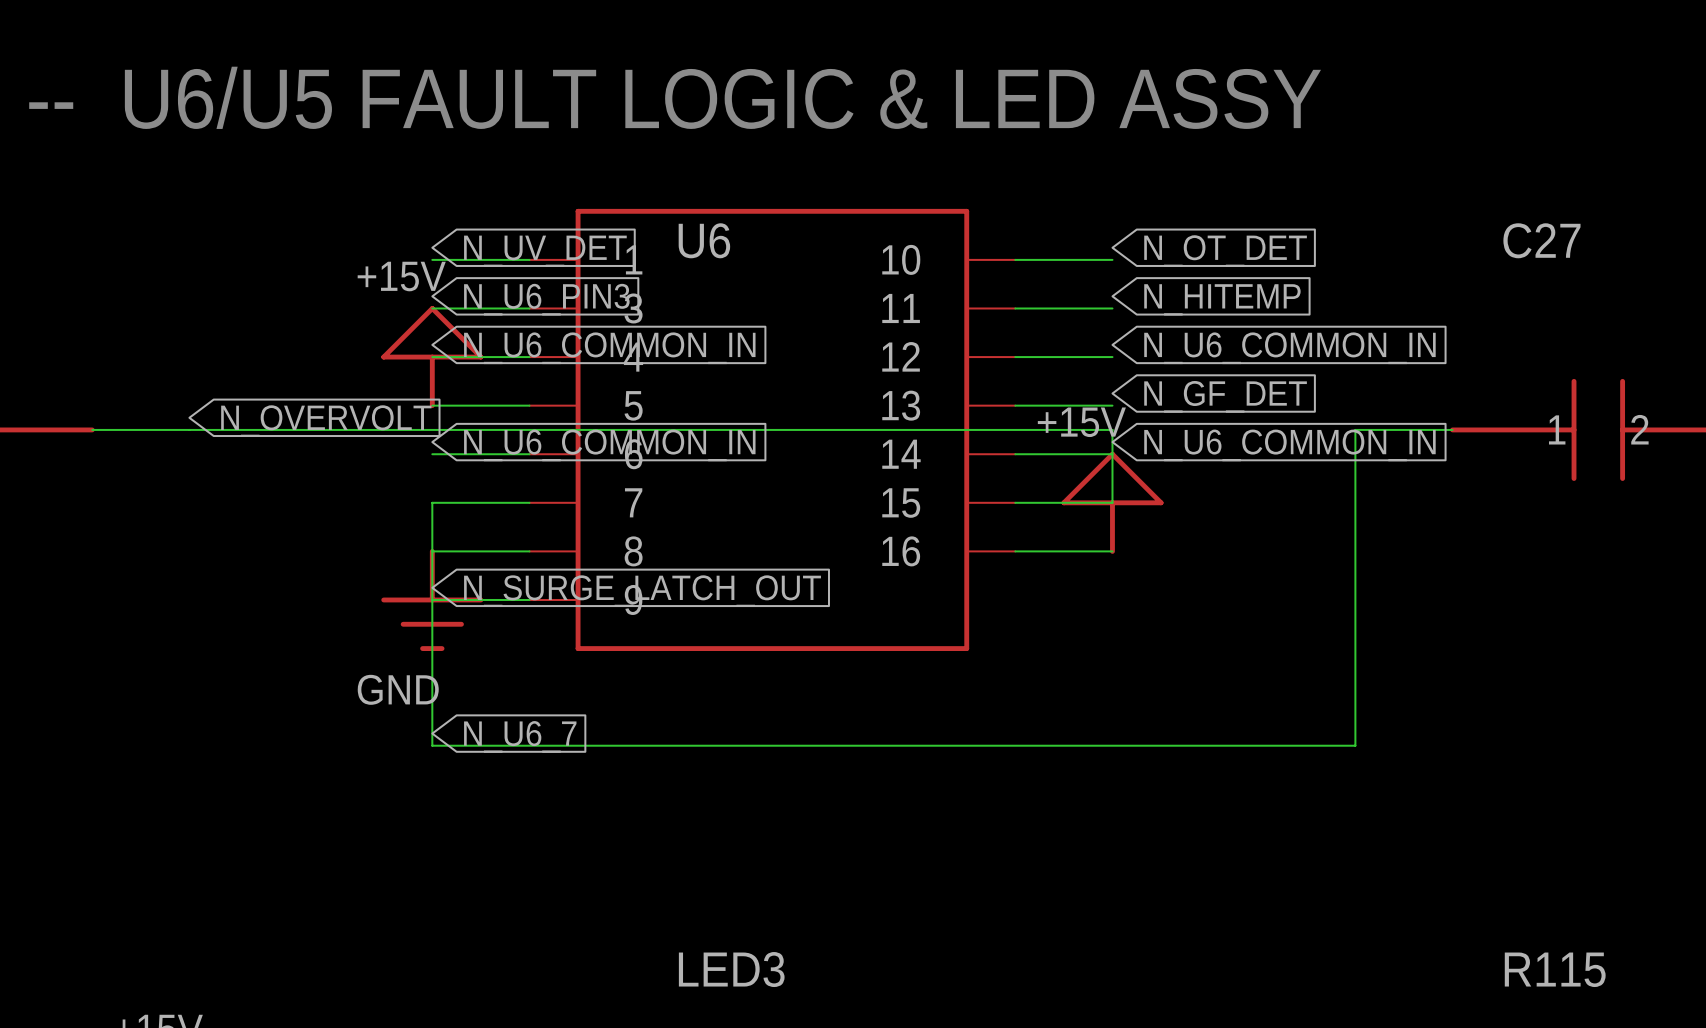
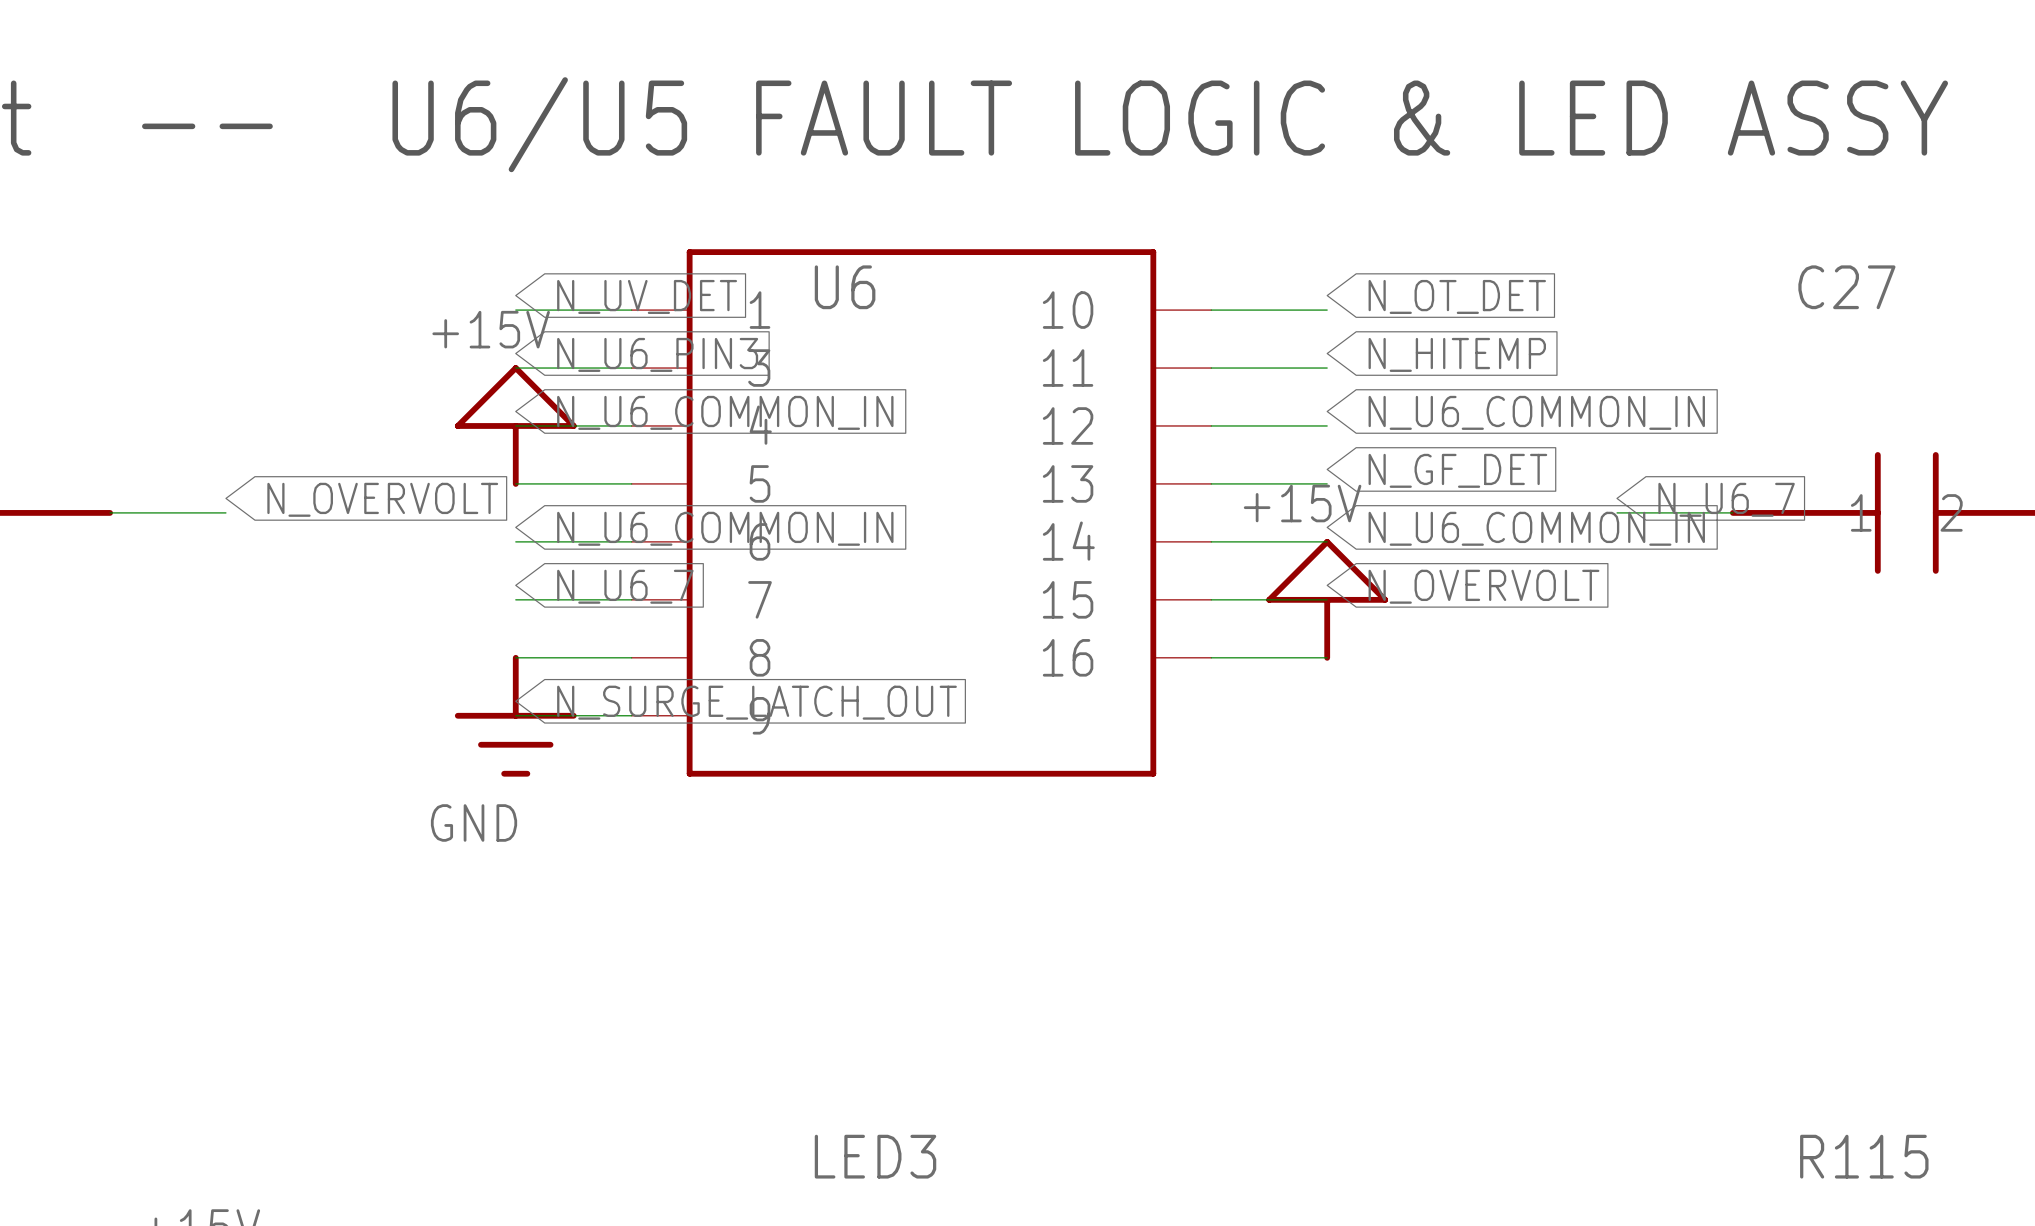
global label: none -> N_U6_7 (1726, 499)
wire: (189, 429) (1112, 429) (1112, 502) -> none
wire: (1355, 429) (1355, 745) (432, 745) (432, 502) -> none
global label: none -> N_OVERVOLT (1483, 586)
global label position: N_U6_7 (520, 736) -> N_U6_7 (625, 586)

